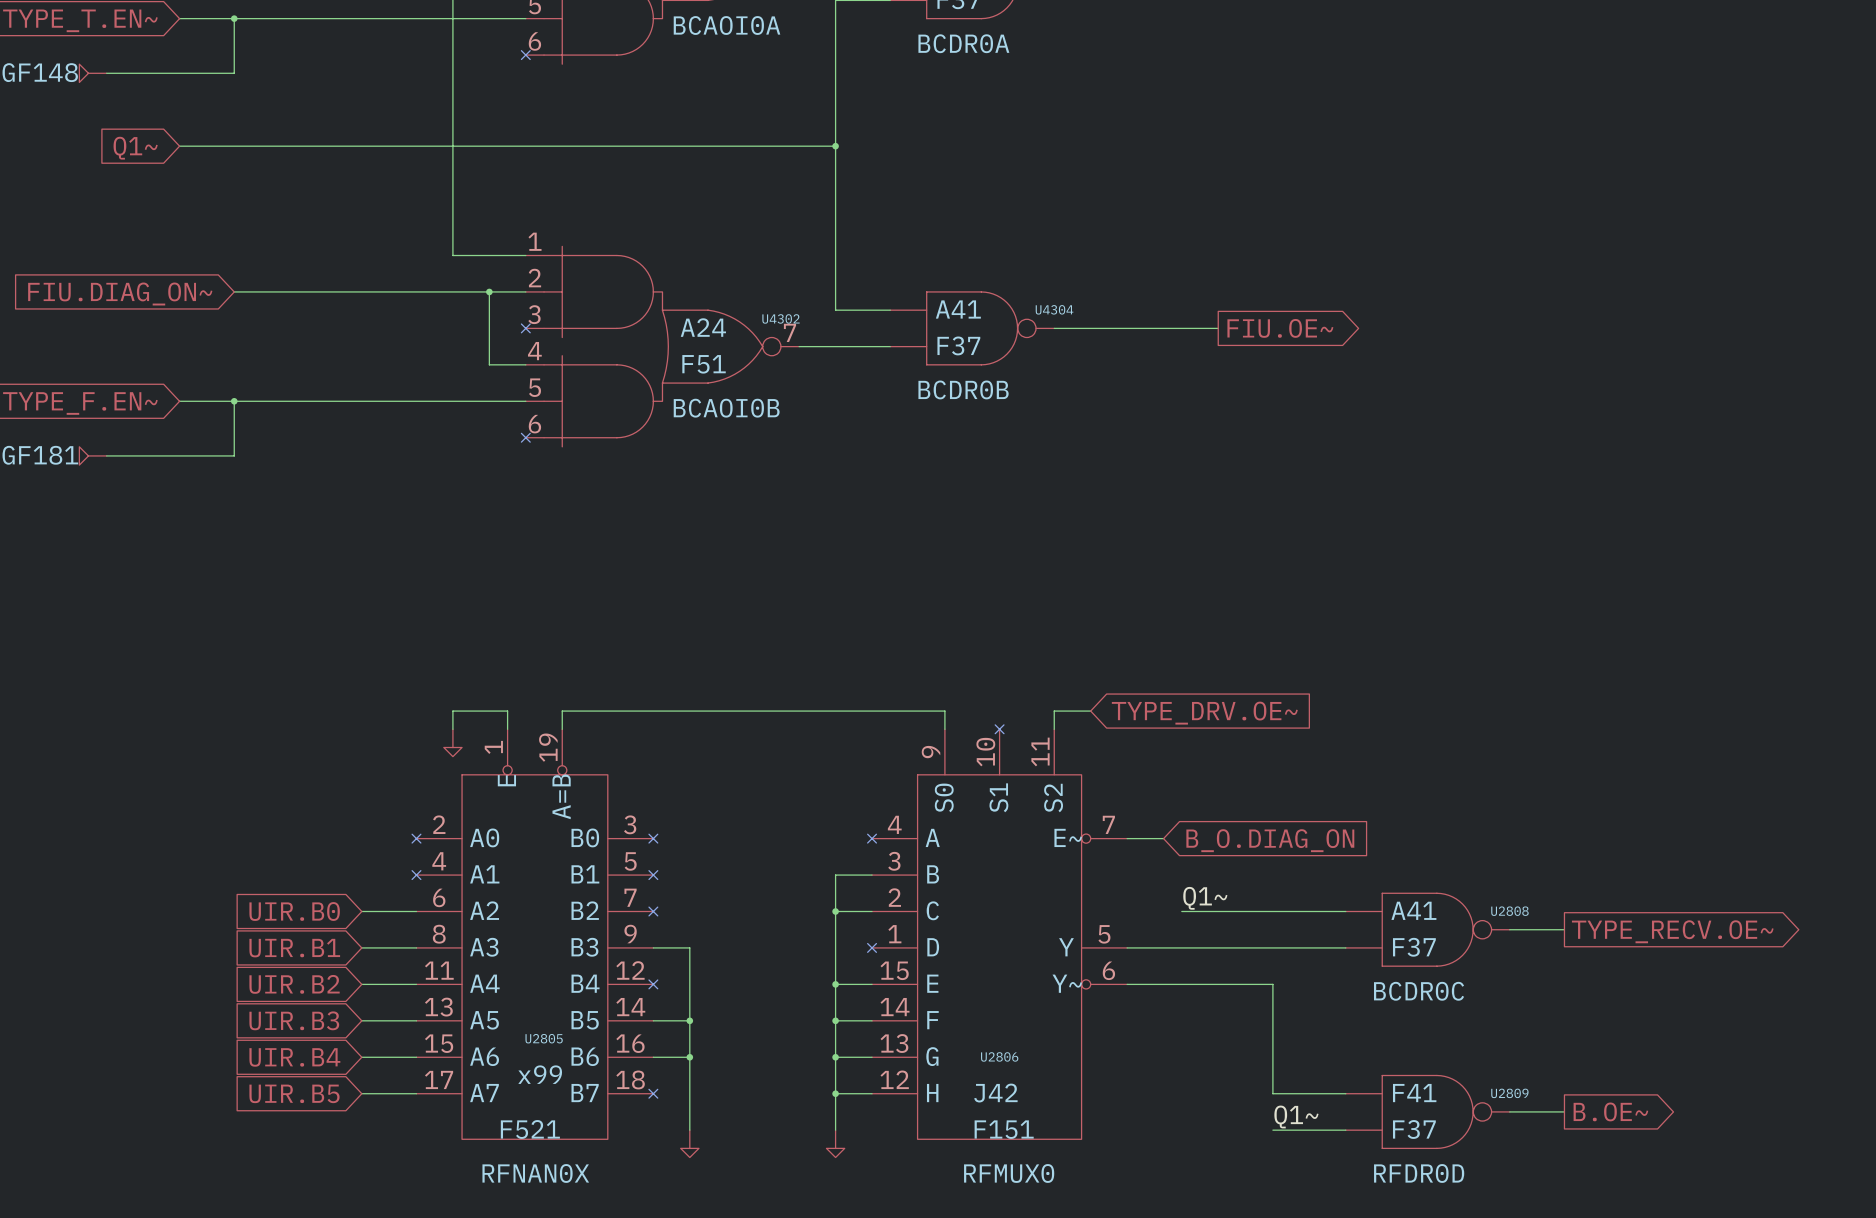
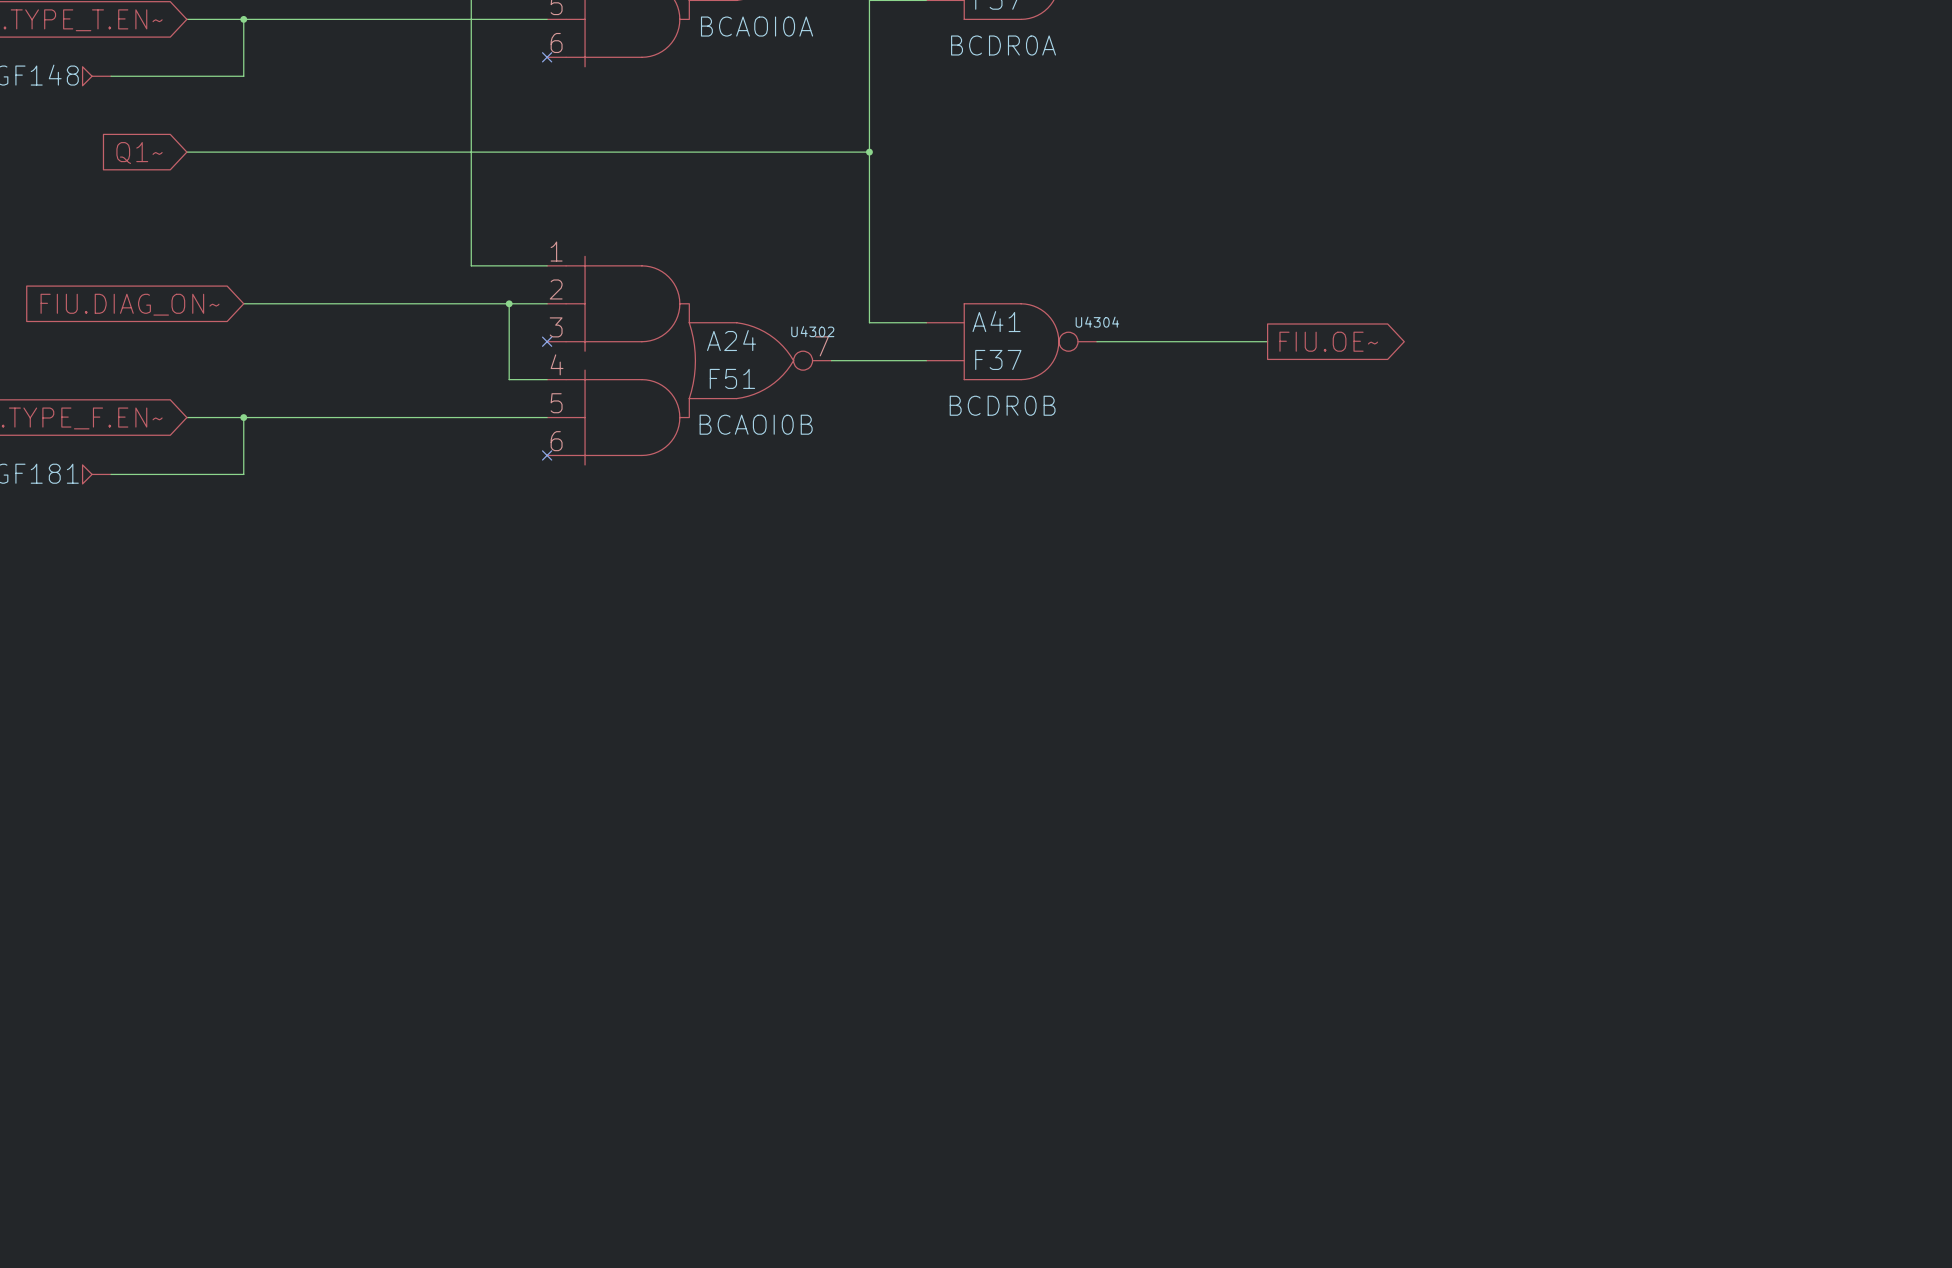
wire: (1090, 711) (1054, 711) (1054, 729) -> none
global label: TYPE_DRV.OE~ (1204, 713) -> none
wire: (452, 729) (452, 711) (507, 711) (507, 729) -> none
wire: (562, 729) (562, 711) (944, 711) (944, 729) -> none
no-connect mark: (999, 729) -> none
power symbol: (452, 743) -> none
no-connect mark: (416, 838) -> none
no-connect mark: (653, 838) -> none
no-connect mark: (872, 838) -> none
wire: (1127, 838) (1163, 838) -> none
global label: B_O.DIAG_ON (1270, 840) -> none
no-connect mark: (416, 875) -> none
no-connect mark: (653, 875) -> none
wire: (872, 875) (835, 875) (835, 1130) -> none
label: Q1~ (1205, 898) -> none
global label: UIR.B0 (294, 911) -> none
wire: (361, 911) (416, 911) -> none
no-connect mark: (653, 911) -> none
wire: (835, 911) (872, 911) -> none
junction: (835, 911) -> none
wire: (1181, 911) (1345, 911) -> none
U2808: F37 (1427, 929) -> none
wire: (1509, 929) (1564, 929) -> none
global label: TYPE_RECV.OE~ (1672, 931) -> none
U2805: F521 (534, 934) -> none
U2806: F151 (999, 934) -> none
wire: (361, 947) (416, 947) -> none
wire: (653, 947) (689, 947) (689, 1130) -> none
no-connect mark: (872, 947) -> none
wire: (1127, 947) (1345, 947) -> none
global label: UIR.B1 (294, 948) -> none
global label: UIR.B2 (294, 984) -> none
wire: (361, 984) (416, 984) -> none
no-connect mark: (653, 984) -> none
wire: (835, 984) (872, 984) -> none
junction: (835, 984) -> none
wire: (1127, 984) (1272, 984) (1272, 1093) (1345, 1093) -> none
global label: UIR.B3 (294, 1020) -> none
wire: (361, 1020) (416, 1020) -> none
wire: (653, 1020) (689, 1020) -> none
junction: (689, 1020) -> none
wire: (835, 1020) (872, 1020) -> none
junction: (835, 1020) -> none
global label: UIR.B4 (294, 1057) -> none
wire: (361, 1057) (416, 1057) -> none
wire: (653, 1057) (689, 1057) -> none
junction: (689, 1057) -> none
wire: (835, 1057) (872, 1057) -> none
junction: (835, 1057) -> none
global label: UIR.B5 (294, 1093) -> none
wire: (361, 1093) (416, 1093) -> none
no-connect mark: (653, 1093) -> none
wire: (835, 1093) (872, 1093) -> none
junction: (835, 1093) -> none
U2809: F37 (1427, 1111) -> none
wire: (1509, 1111) (1564, 1111) -> none
global label: B.OE~ (1610, 1111) -> none
label: Q1~ (1296, 1116) -> none
wire: (1272, 1130) (1345, 1130) -> none
power symbol: (689, 1144) -> none
power symbol: (835, 1144) -> none

